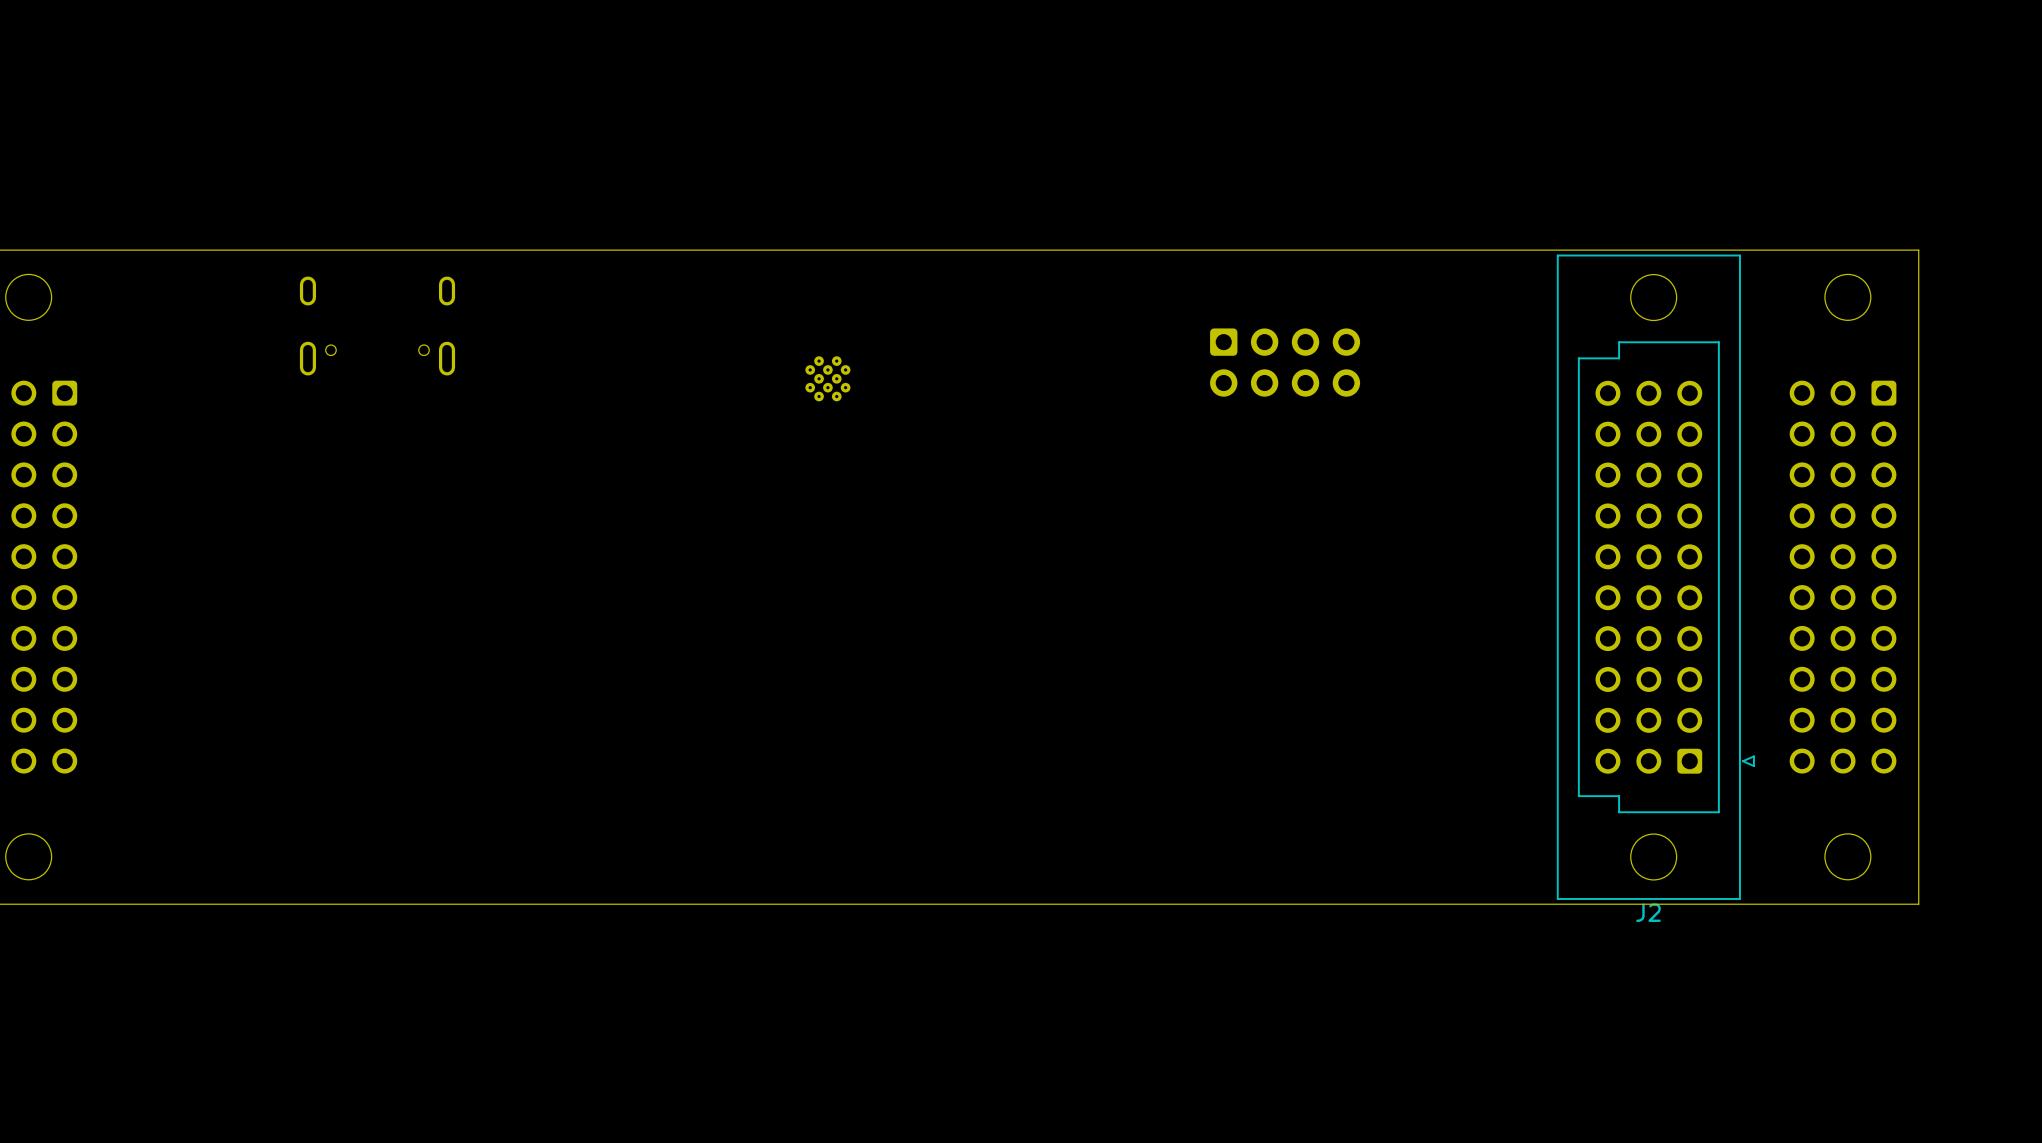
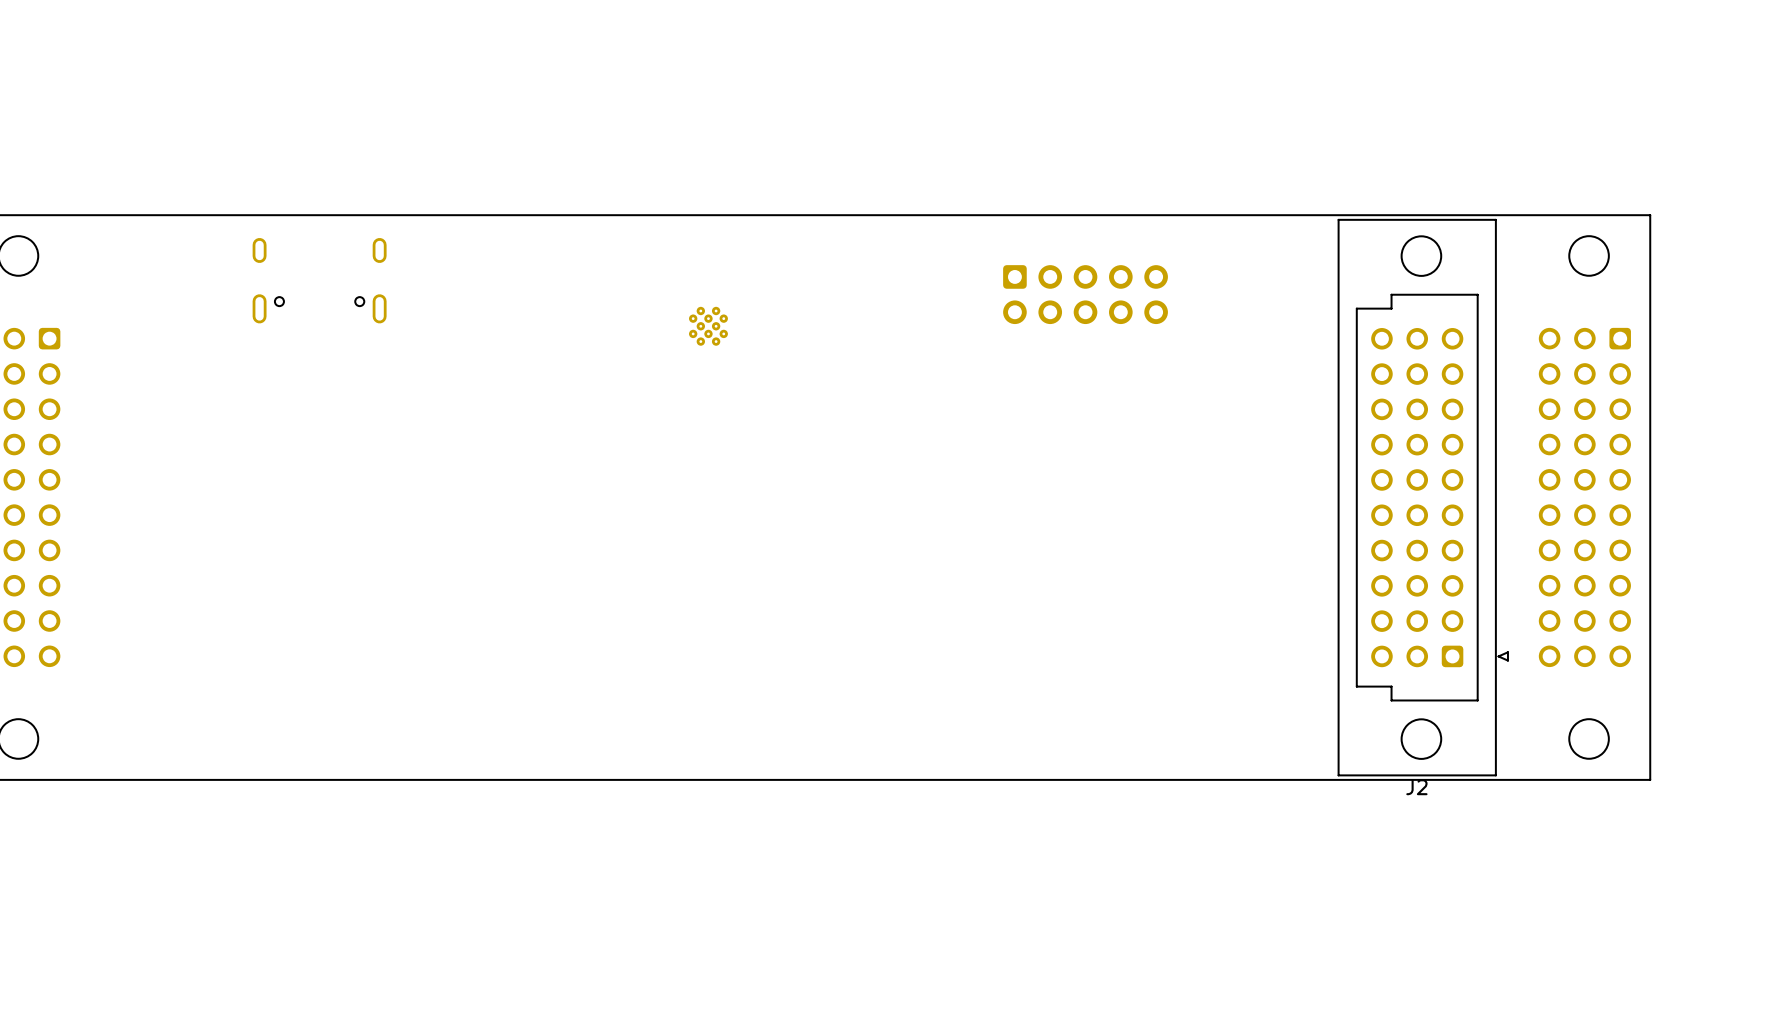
part: none -> (1085, 294)
part: (1285, 362) -> none

